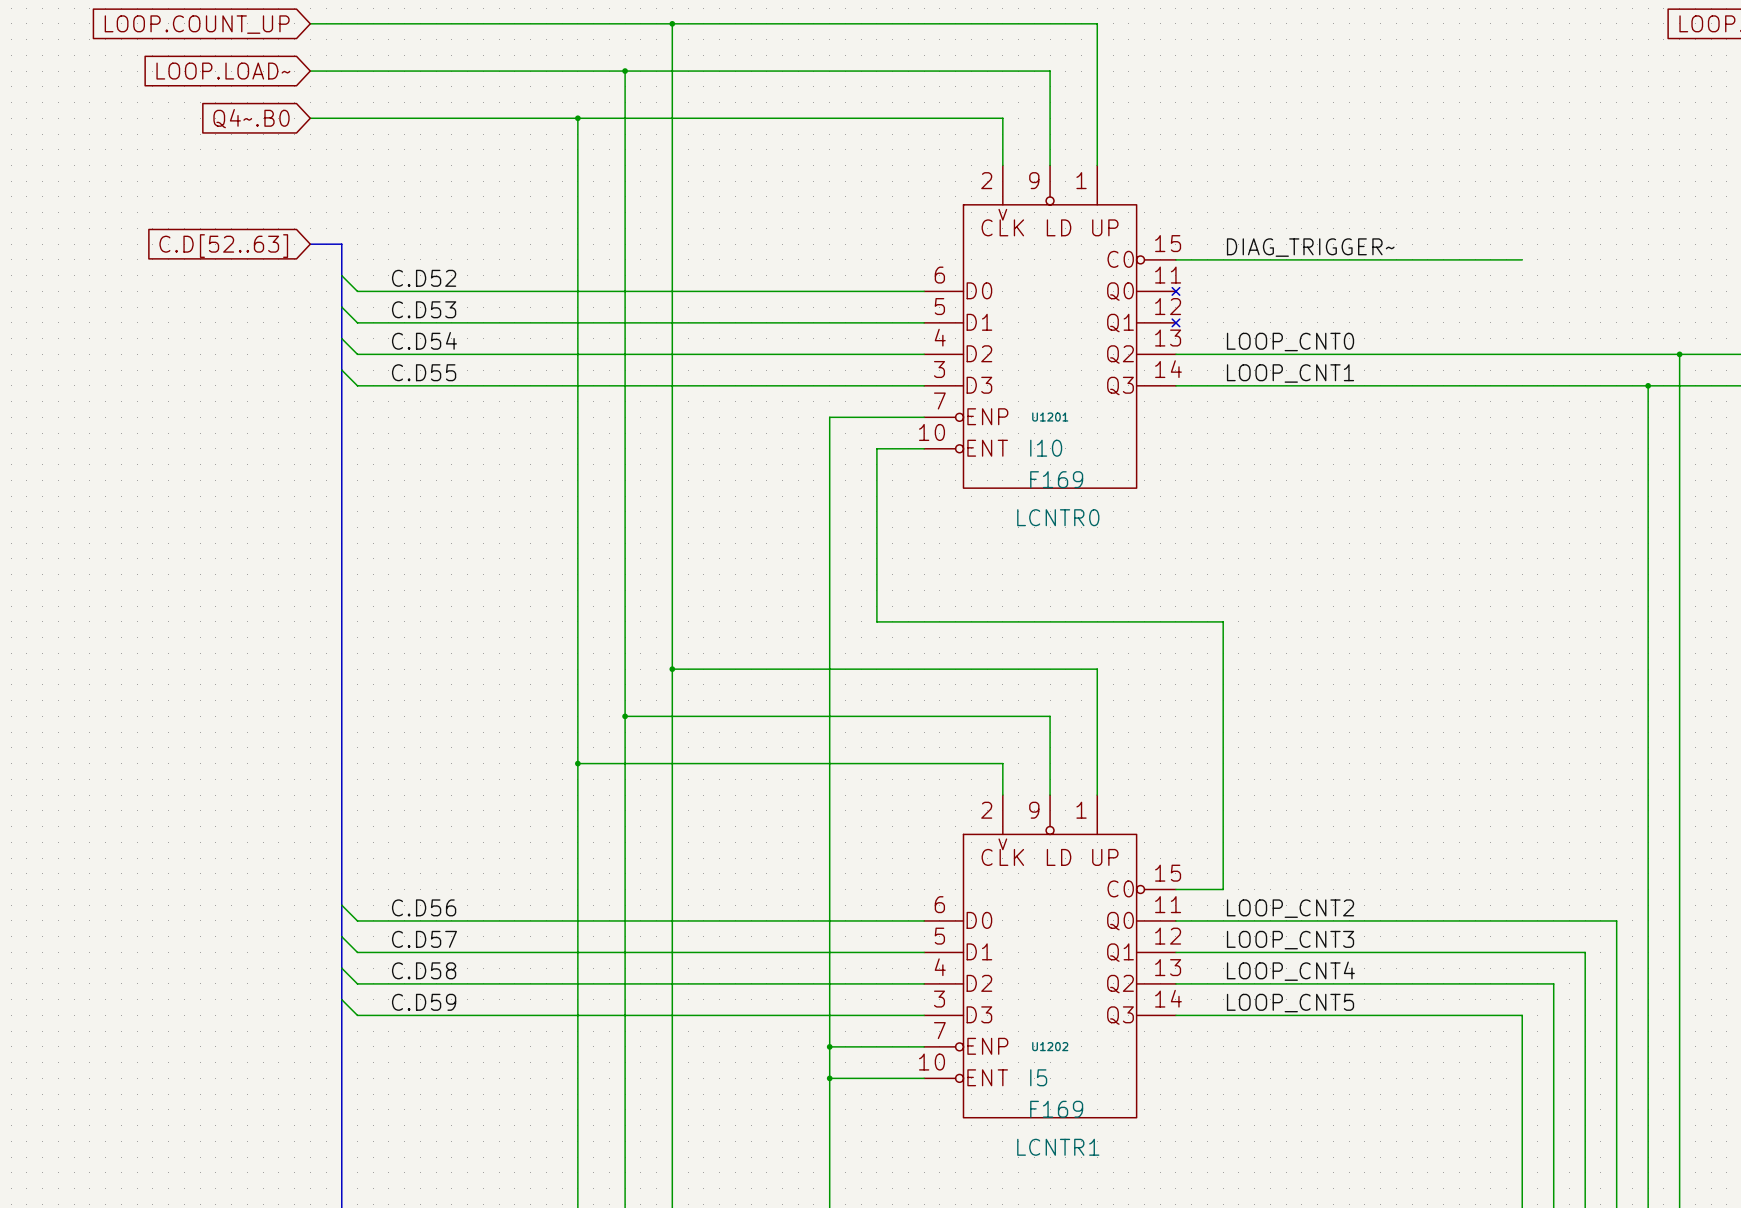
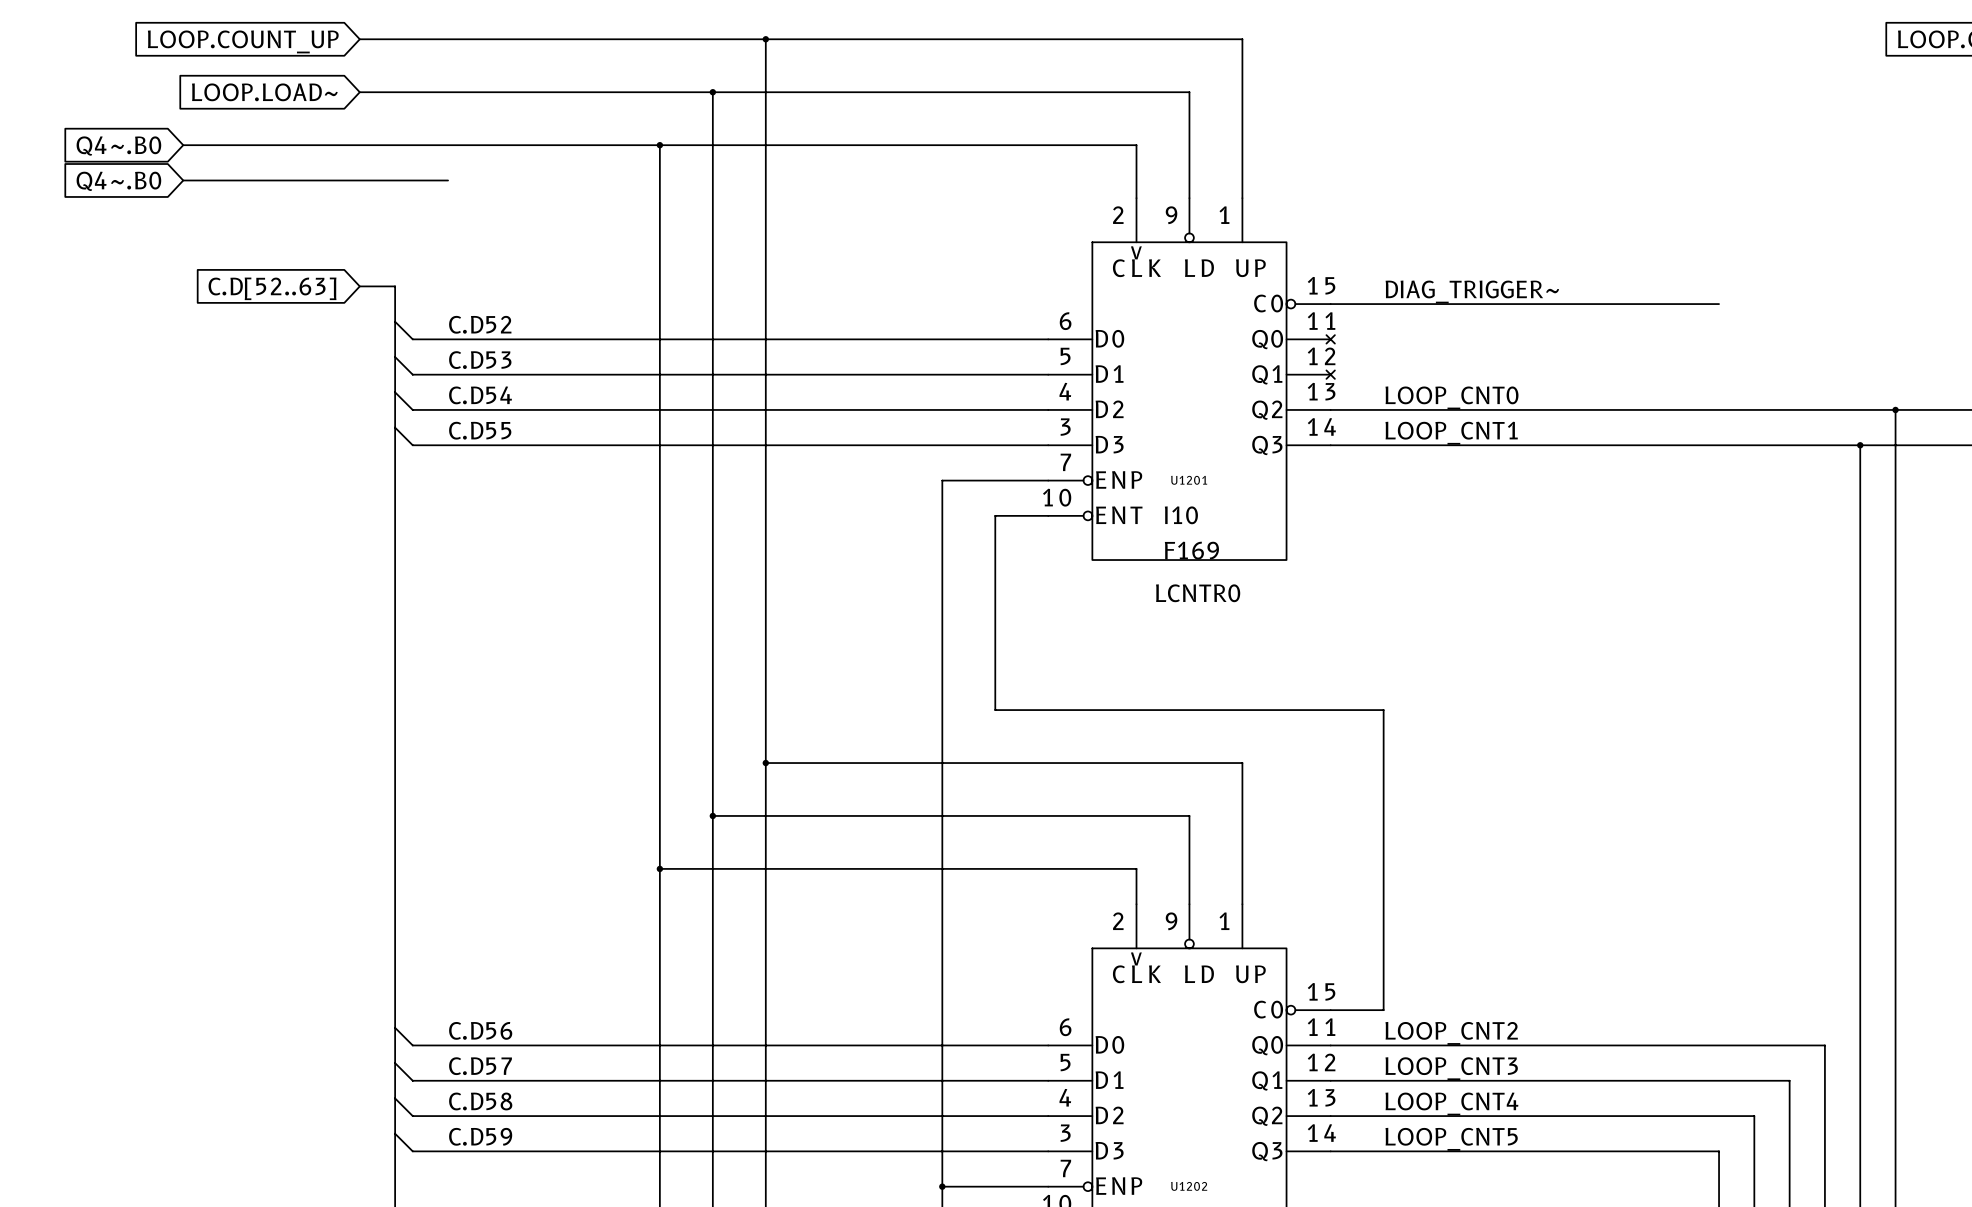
global label: none -> Q4~.B0 (118, 146)
wire: none -> (183, 145) (359, 145)
global label: Q4~.B0 (251, 118) -> none
wire: none -> (183, 180) (448, 180)
global label: none -> Q4~.B0 (118, 181)

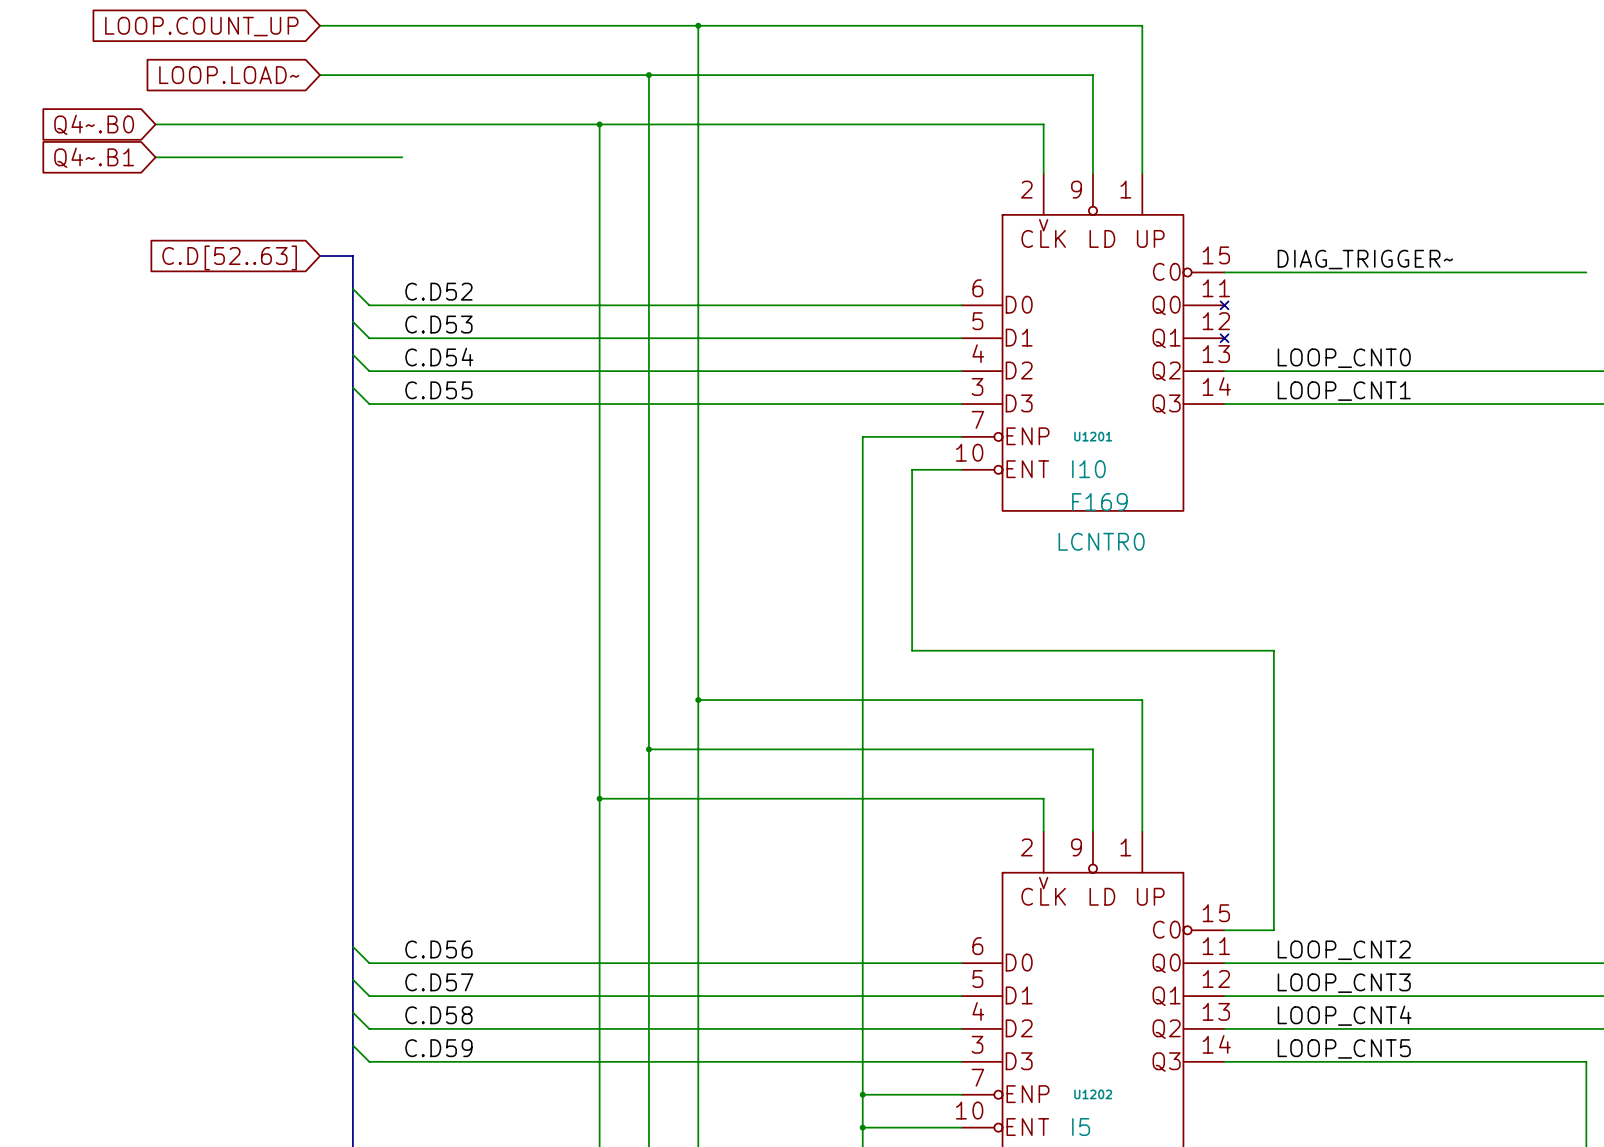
global label: Q4~.B0 (118, 181) -> Q4~.B1 (94, 157)

